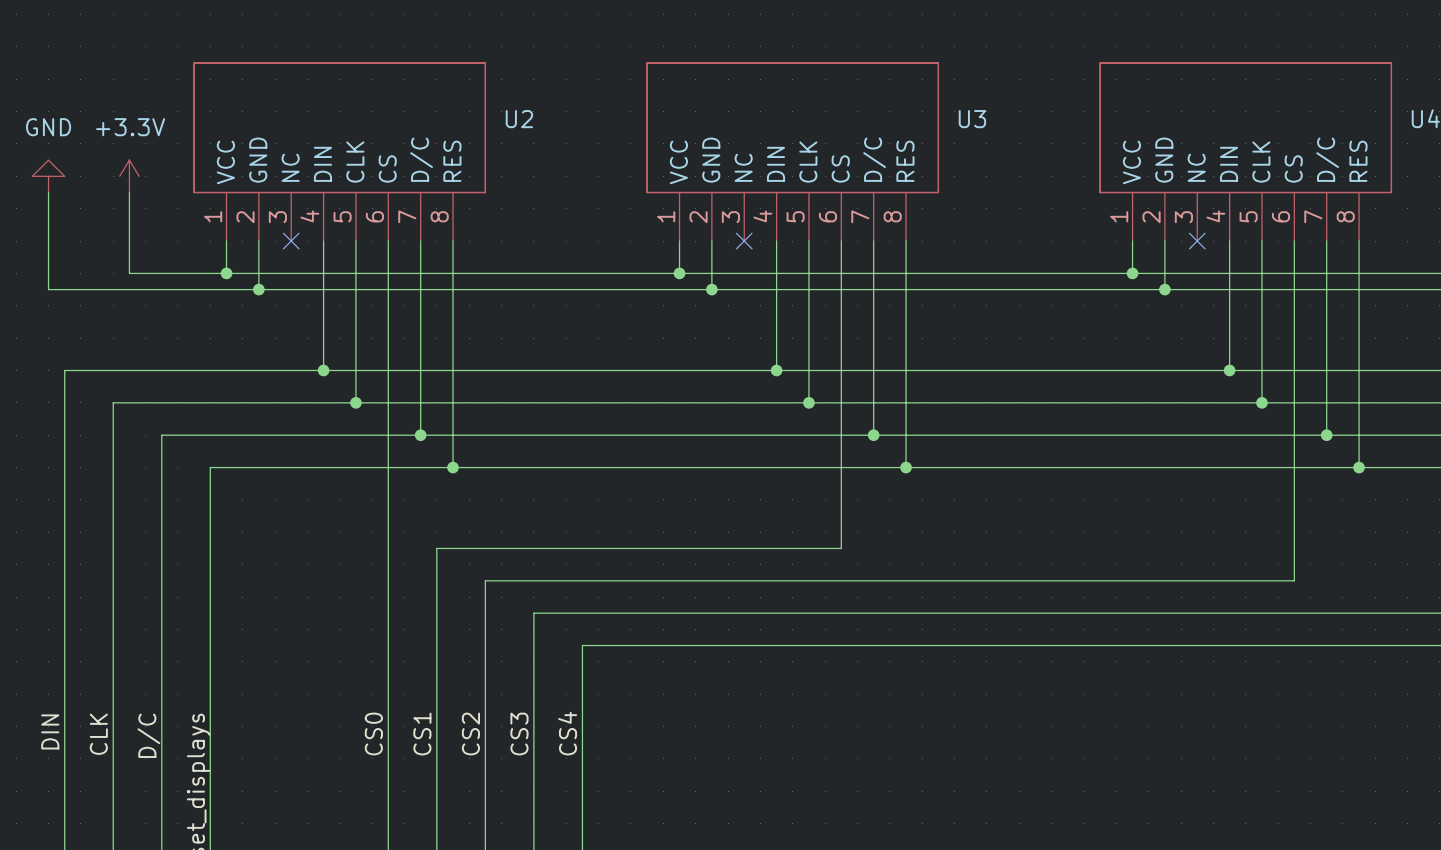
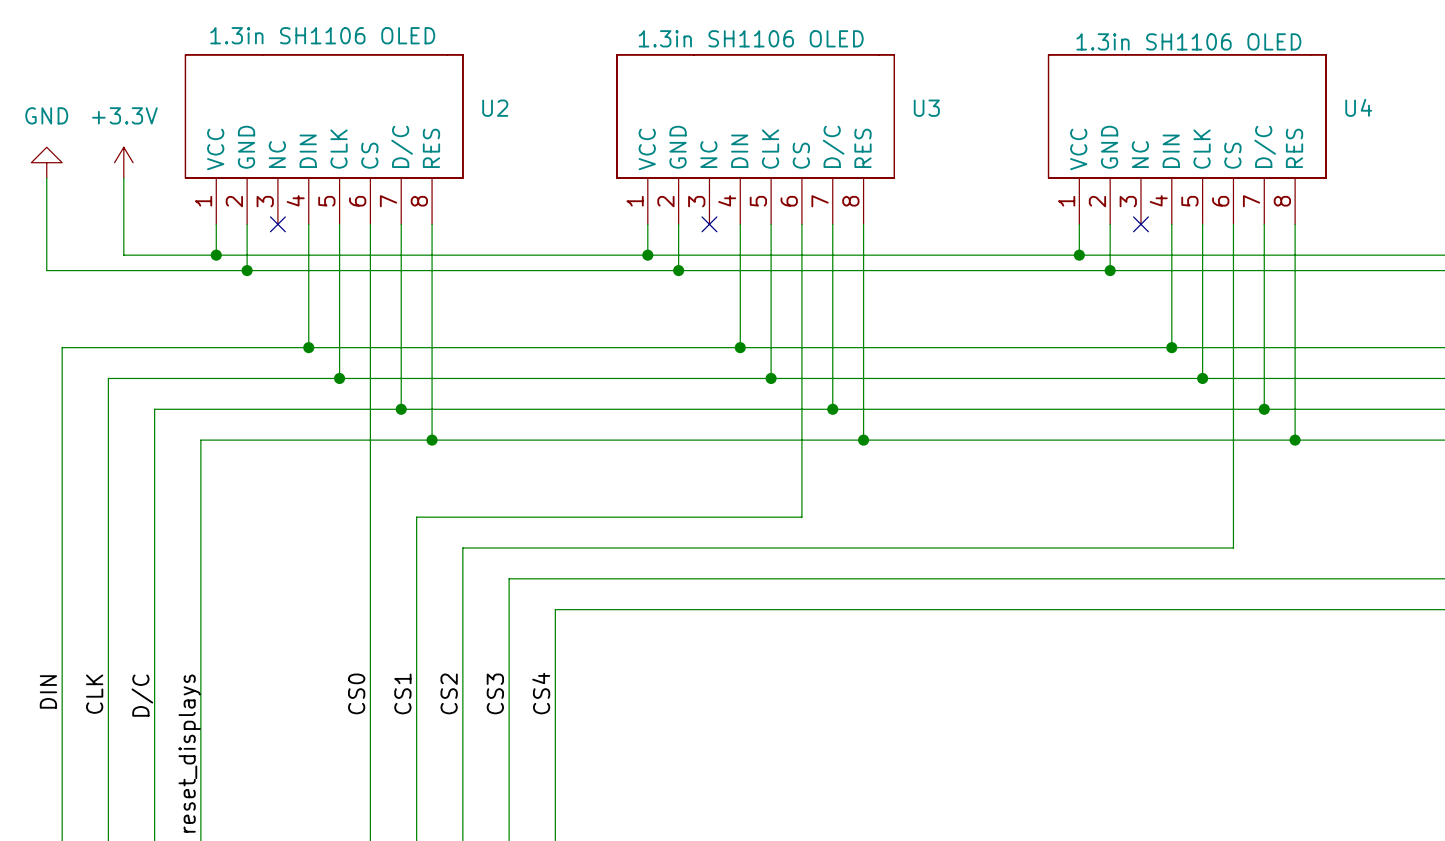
U2 value: none -> 1.3in SH1106 OLED (322, 35)
U3 value: none -> 1.3in SH1106 OLED (751, 38)
U4 value: none -> 1.3in SH1106 OLED (1188, 41)

